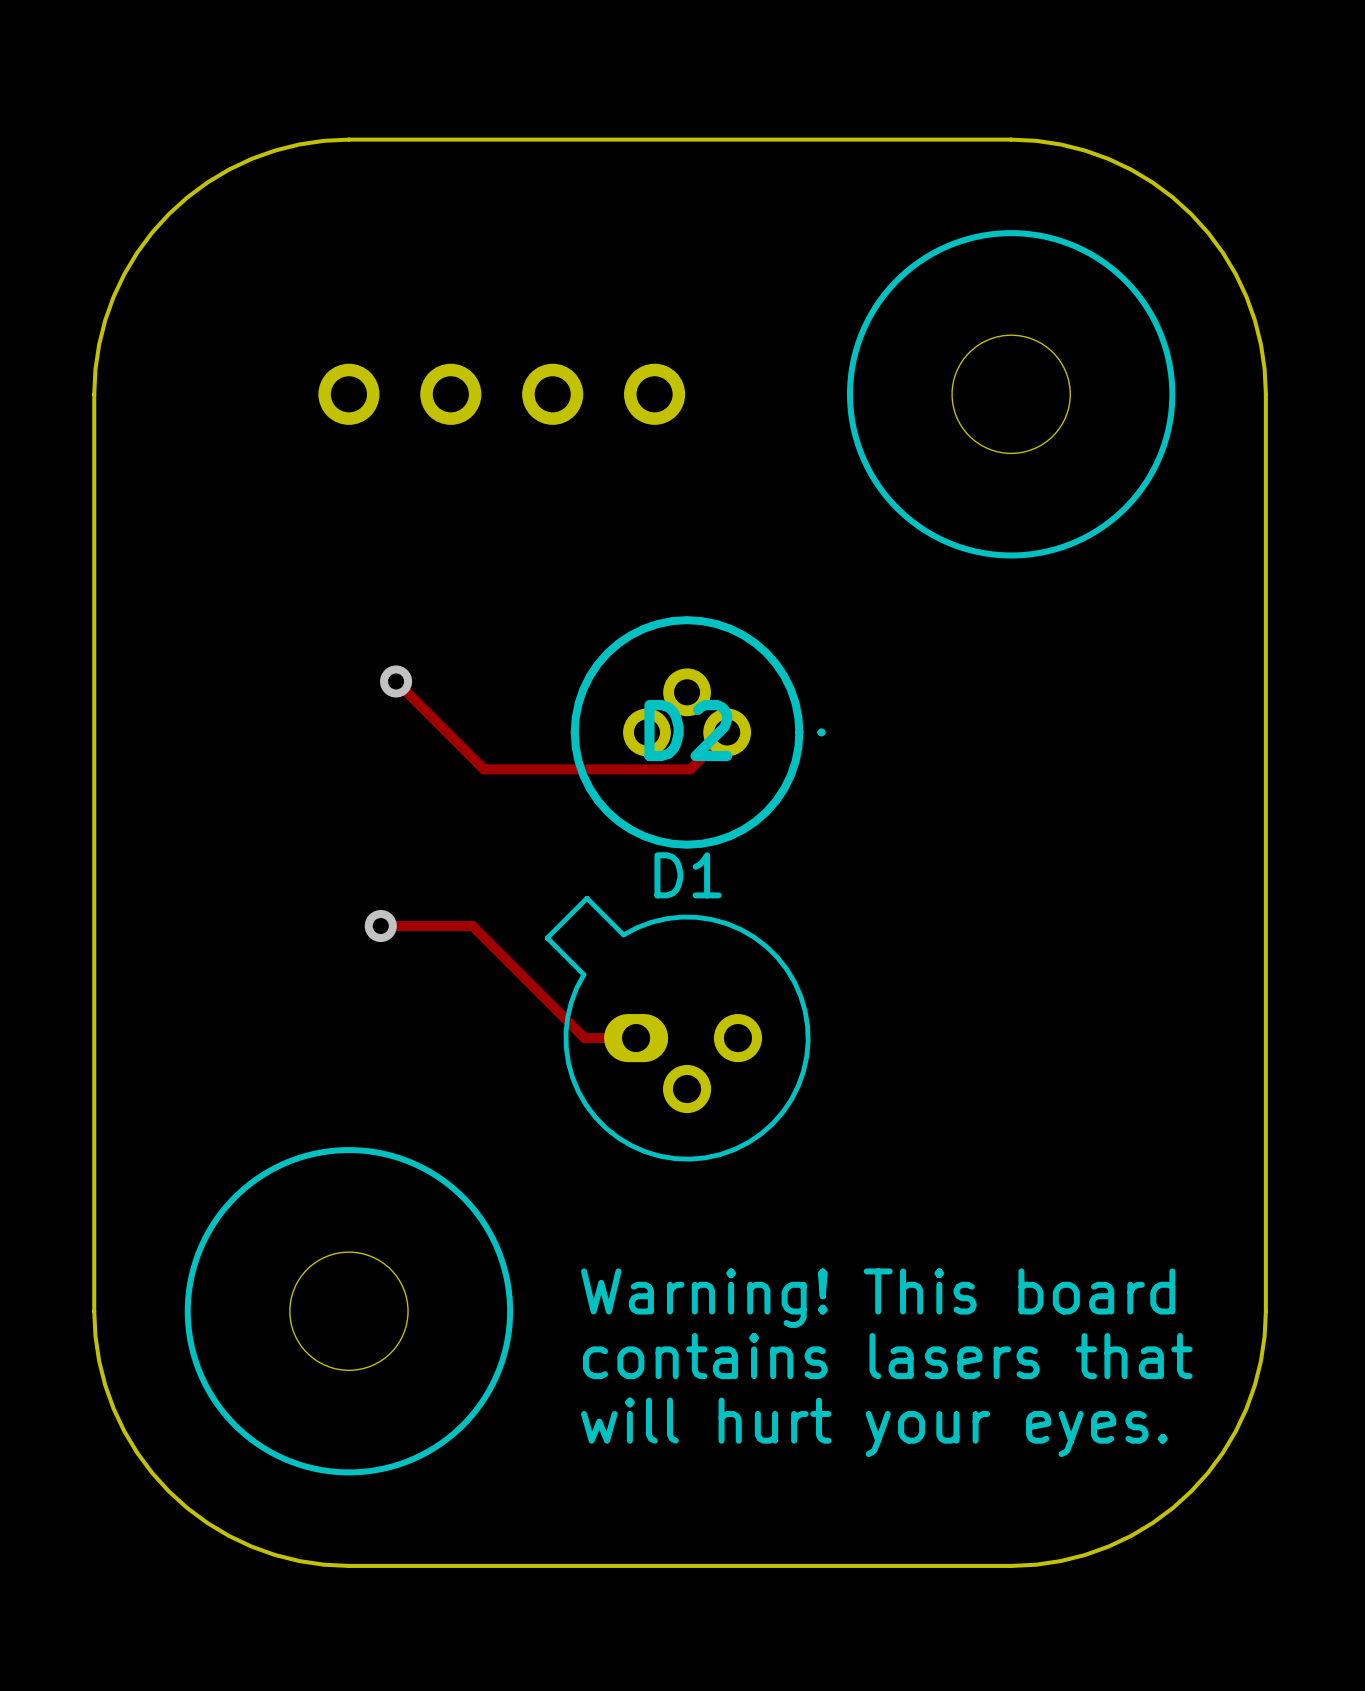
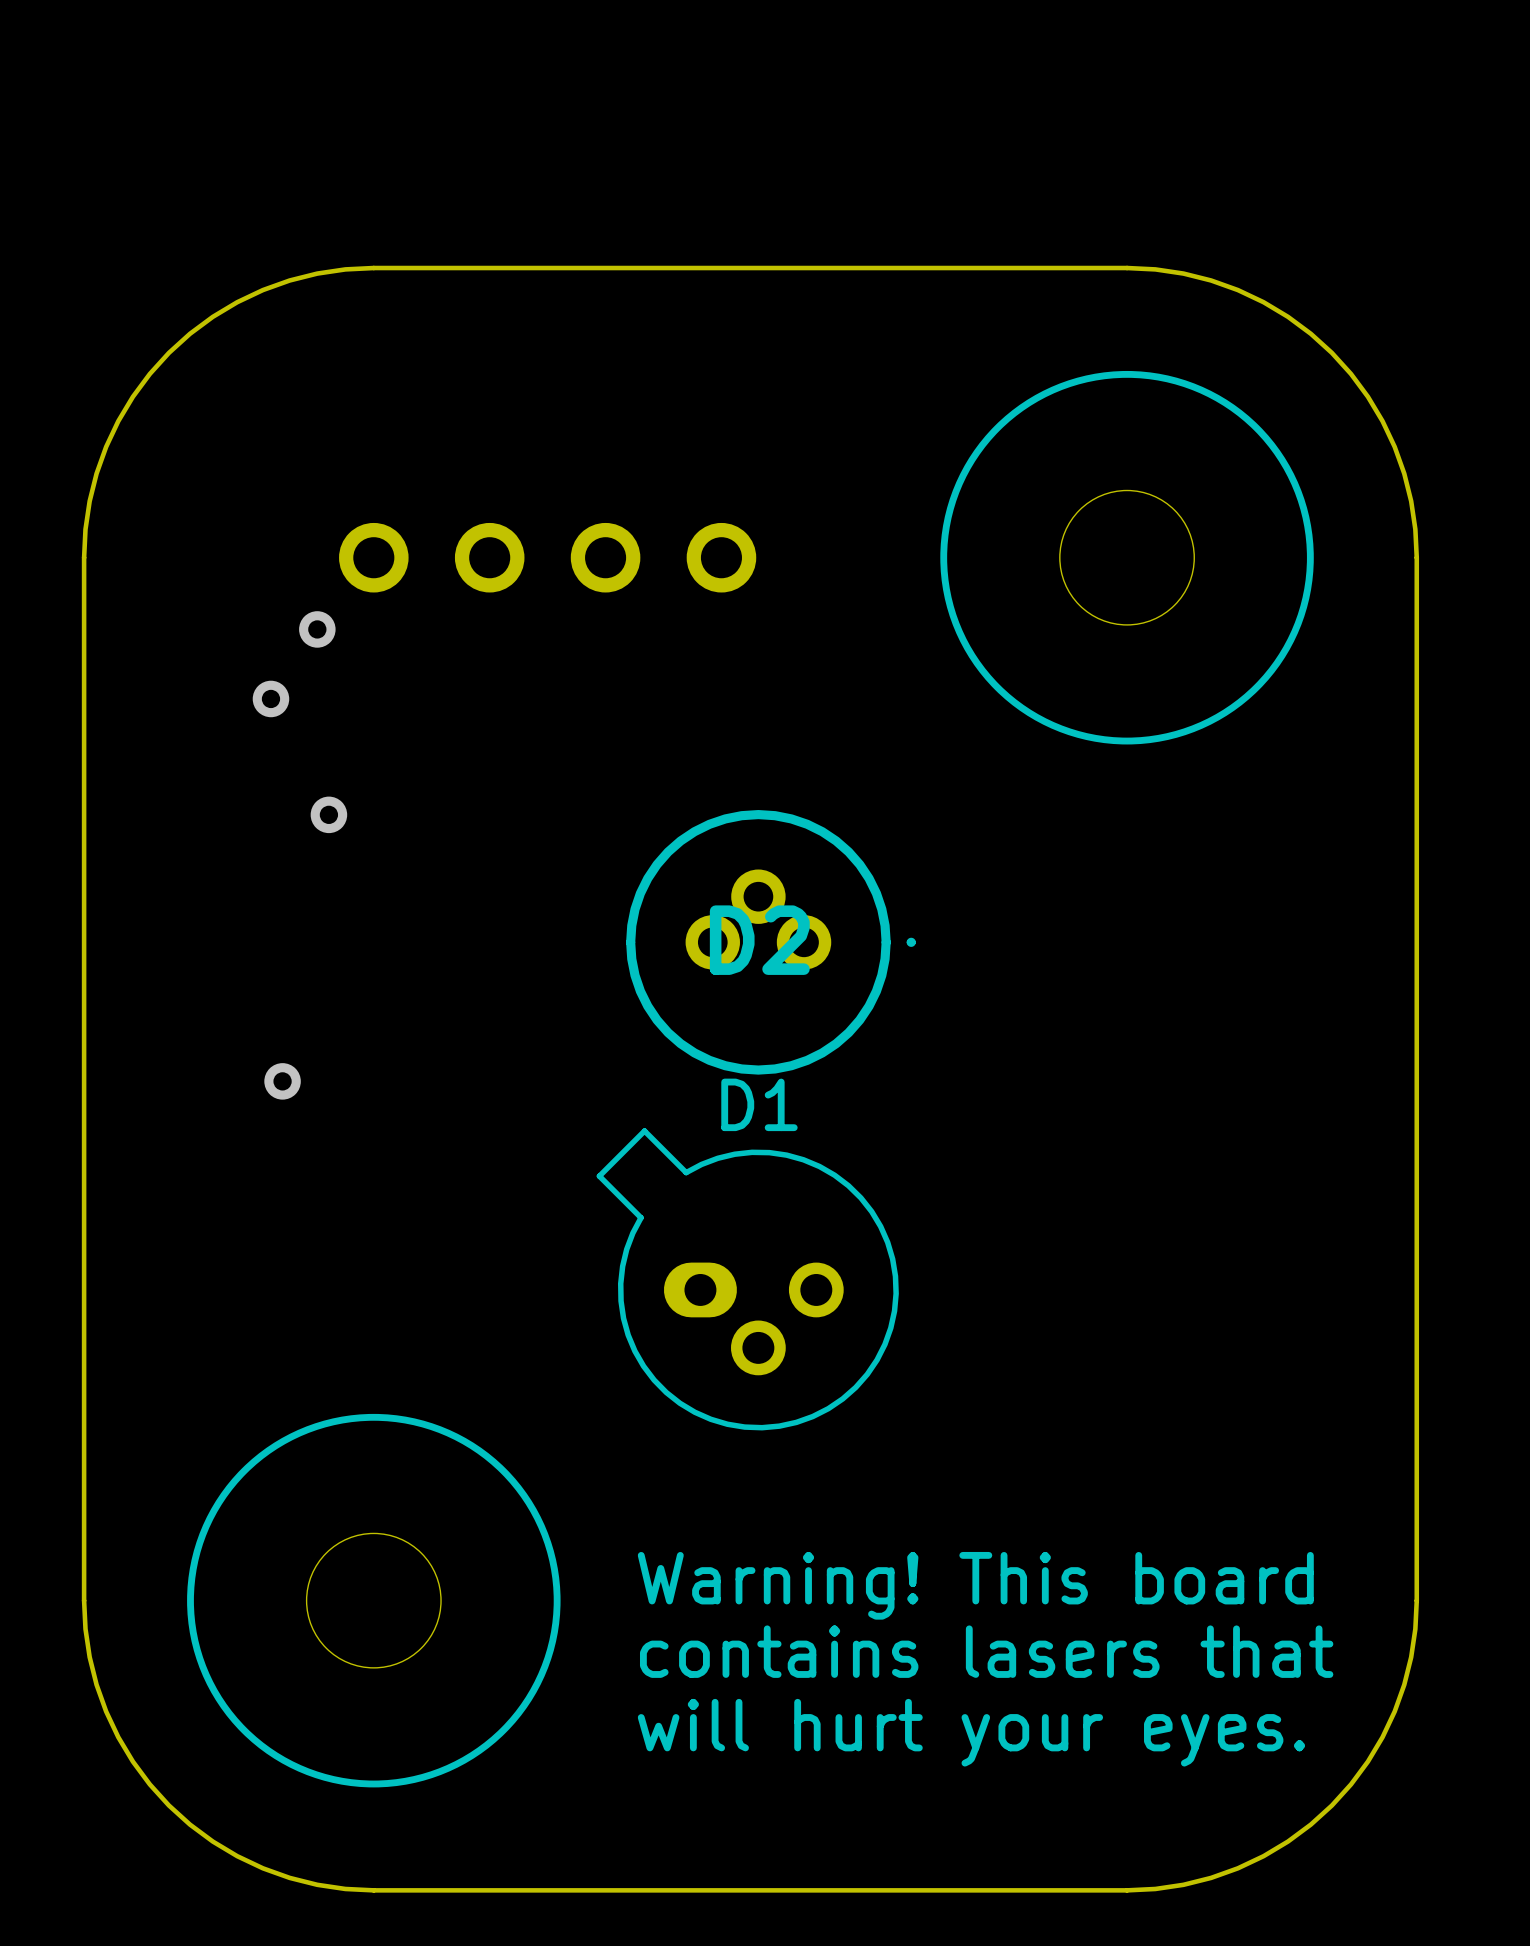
via: none -> (317, 629)
via: none -> (270, 698)
track: (396, 681) (483, 769) (690, 769) (727, 732) -> none
via position: (396, 681) -> (328, 814)
via: none -> (282, 1081)
track: (380, 926) (472, 926) (584, 1038) (636, 1038) -> none
via: (380, 926) -> none

